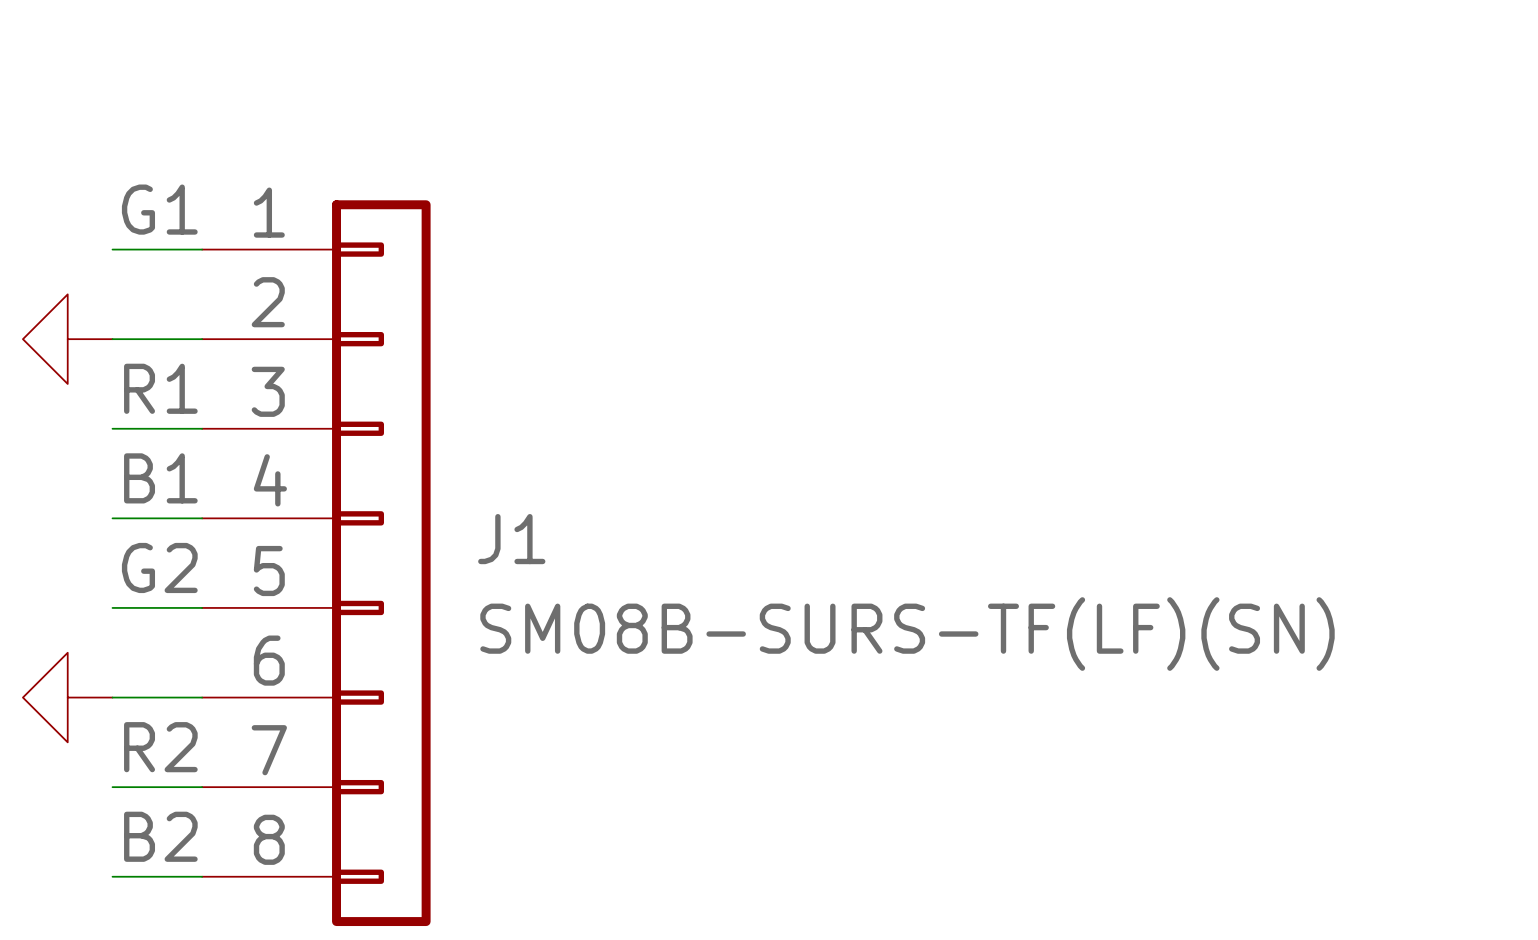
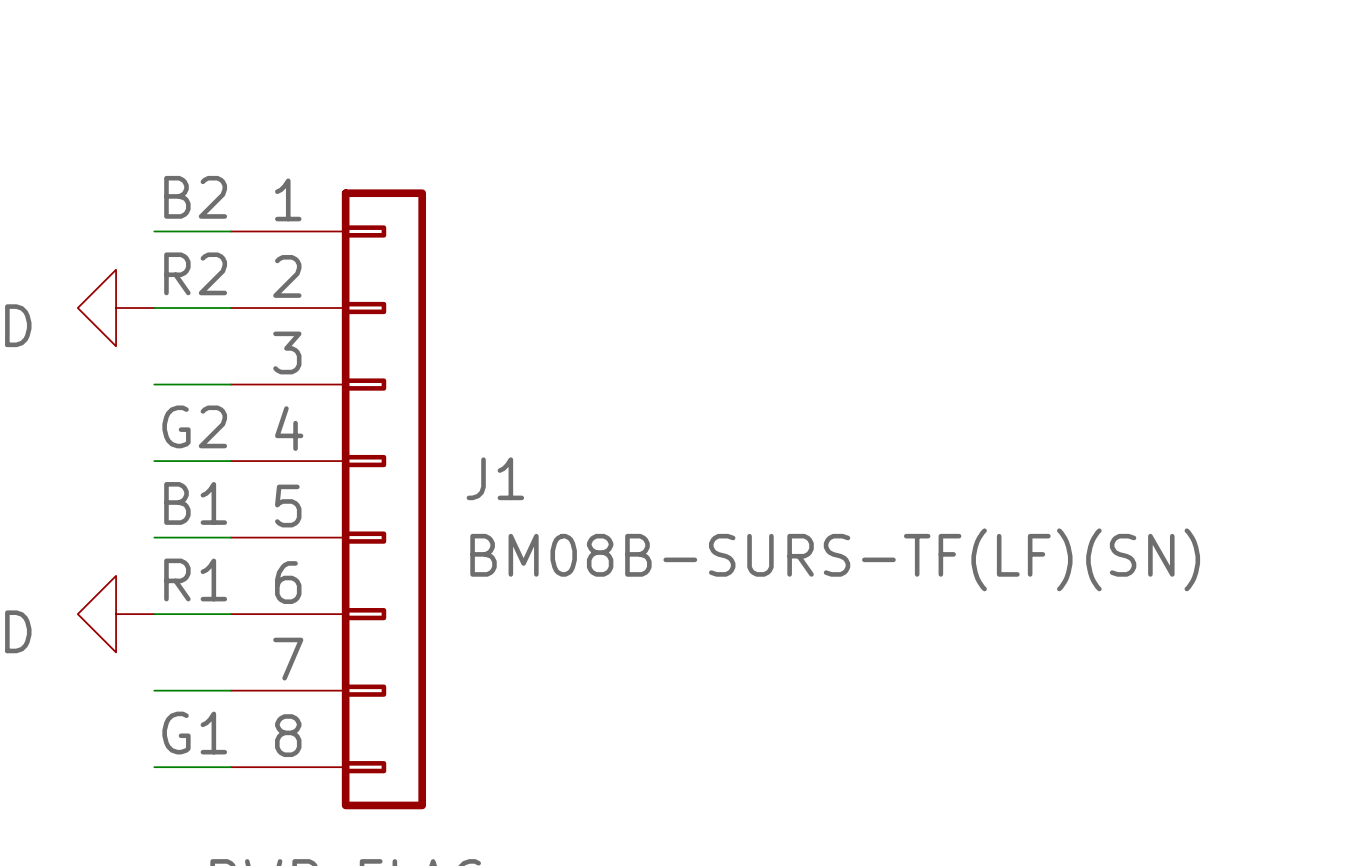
label: G1 (159, 209) -> B2 (195, 197)
label position: R1 (160, 388) -> R1 (195, 579)
label: B1 (160, 478) -> G2 (194, 426)
label: G2 (159, 567) -> B1 (195, 503)
J1 value: SM08B-SURS-TF(LF)(SN) (907, 634) -> BM08B-SURS-TF(LF)(SN) (835, 559)
label position: R2 (160, 747) -> R2 (195, 273)
label: B2 (160, 836) -> G1 (194, 733)

